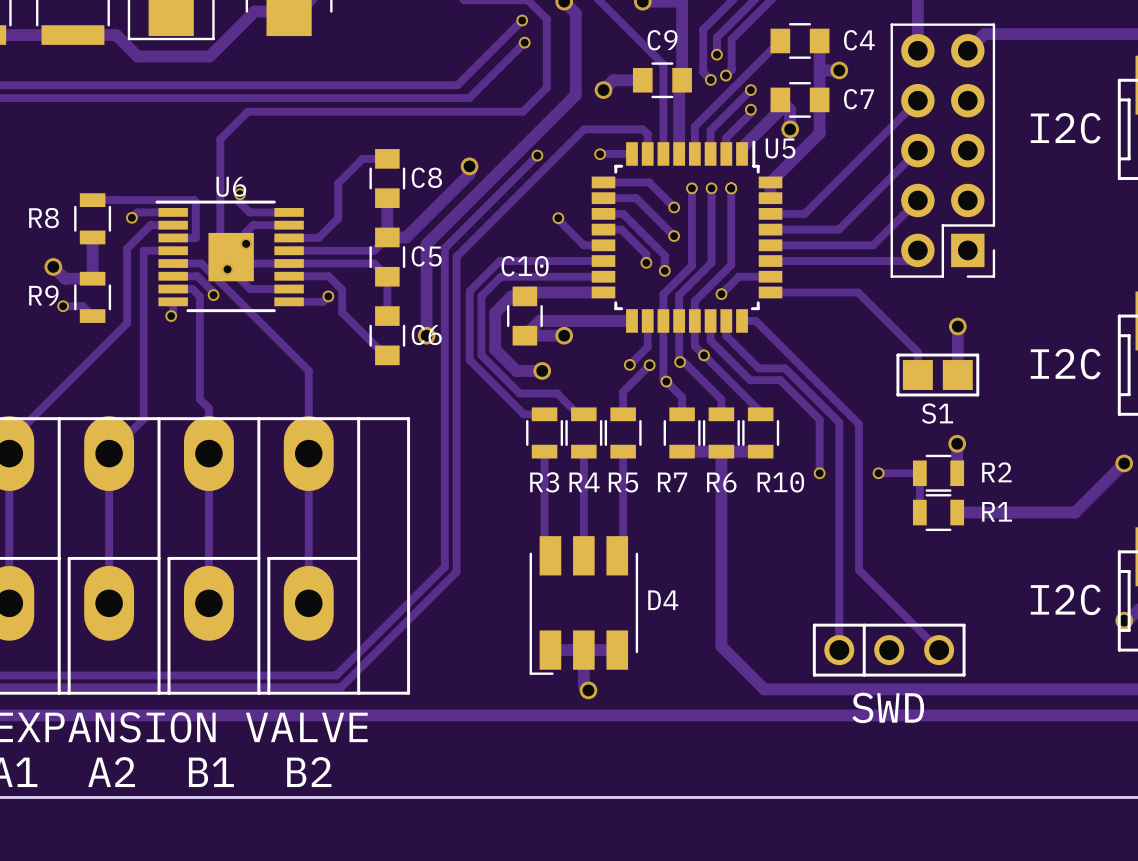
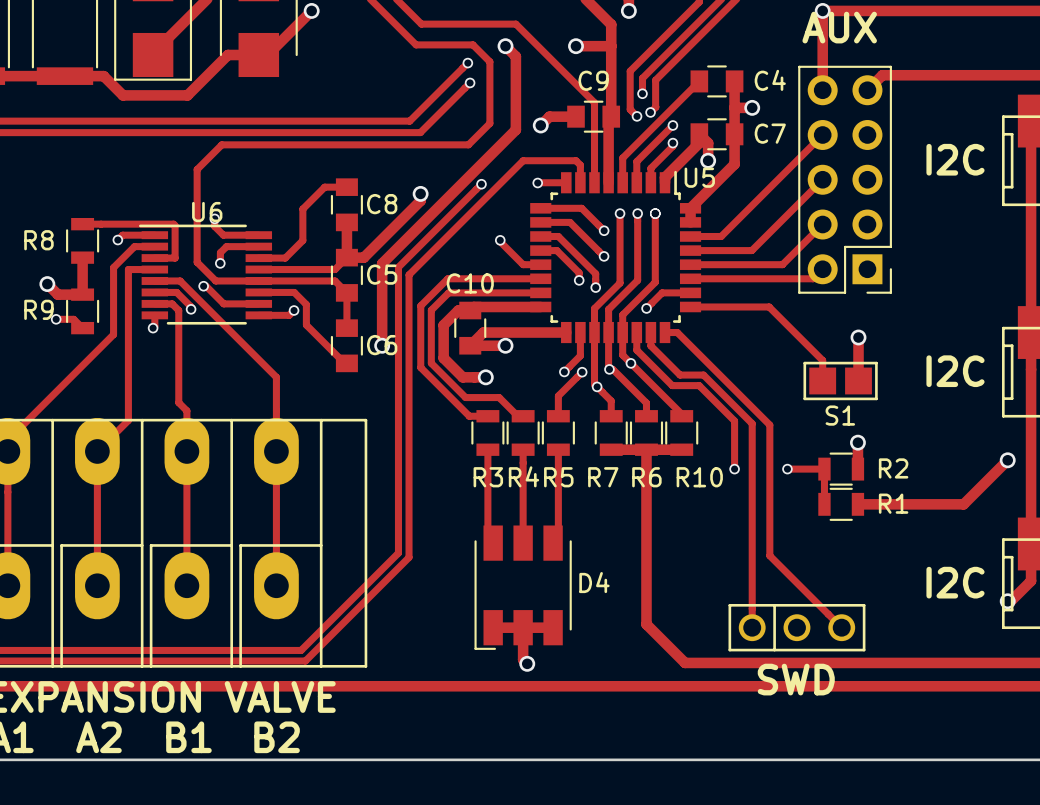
U6 footprint: [155, 200, 304, 313] -> [138, 224, 273, 325]

